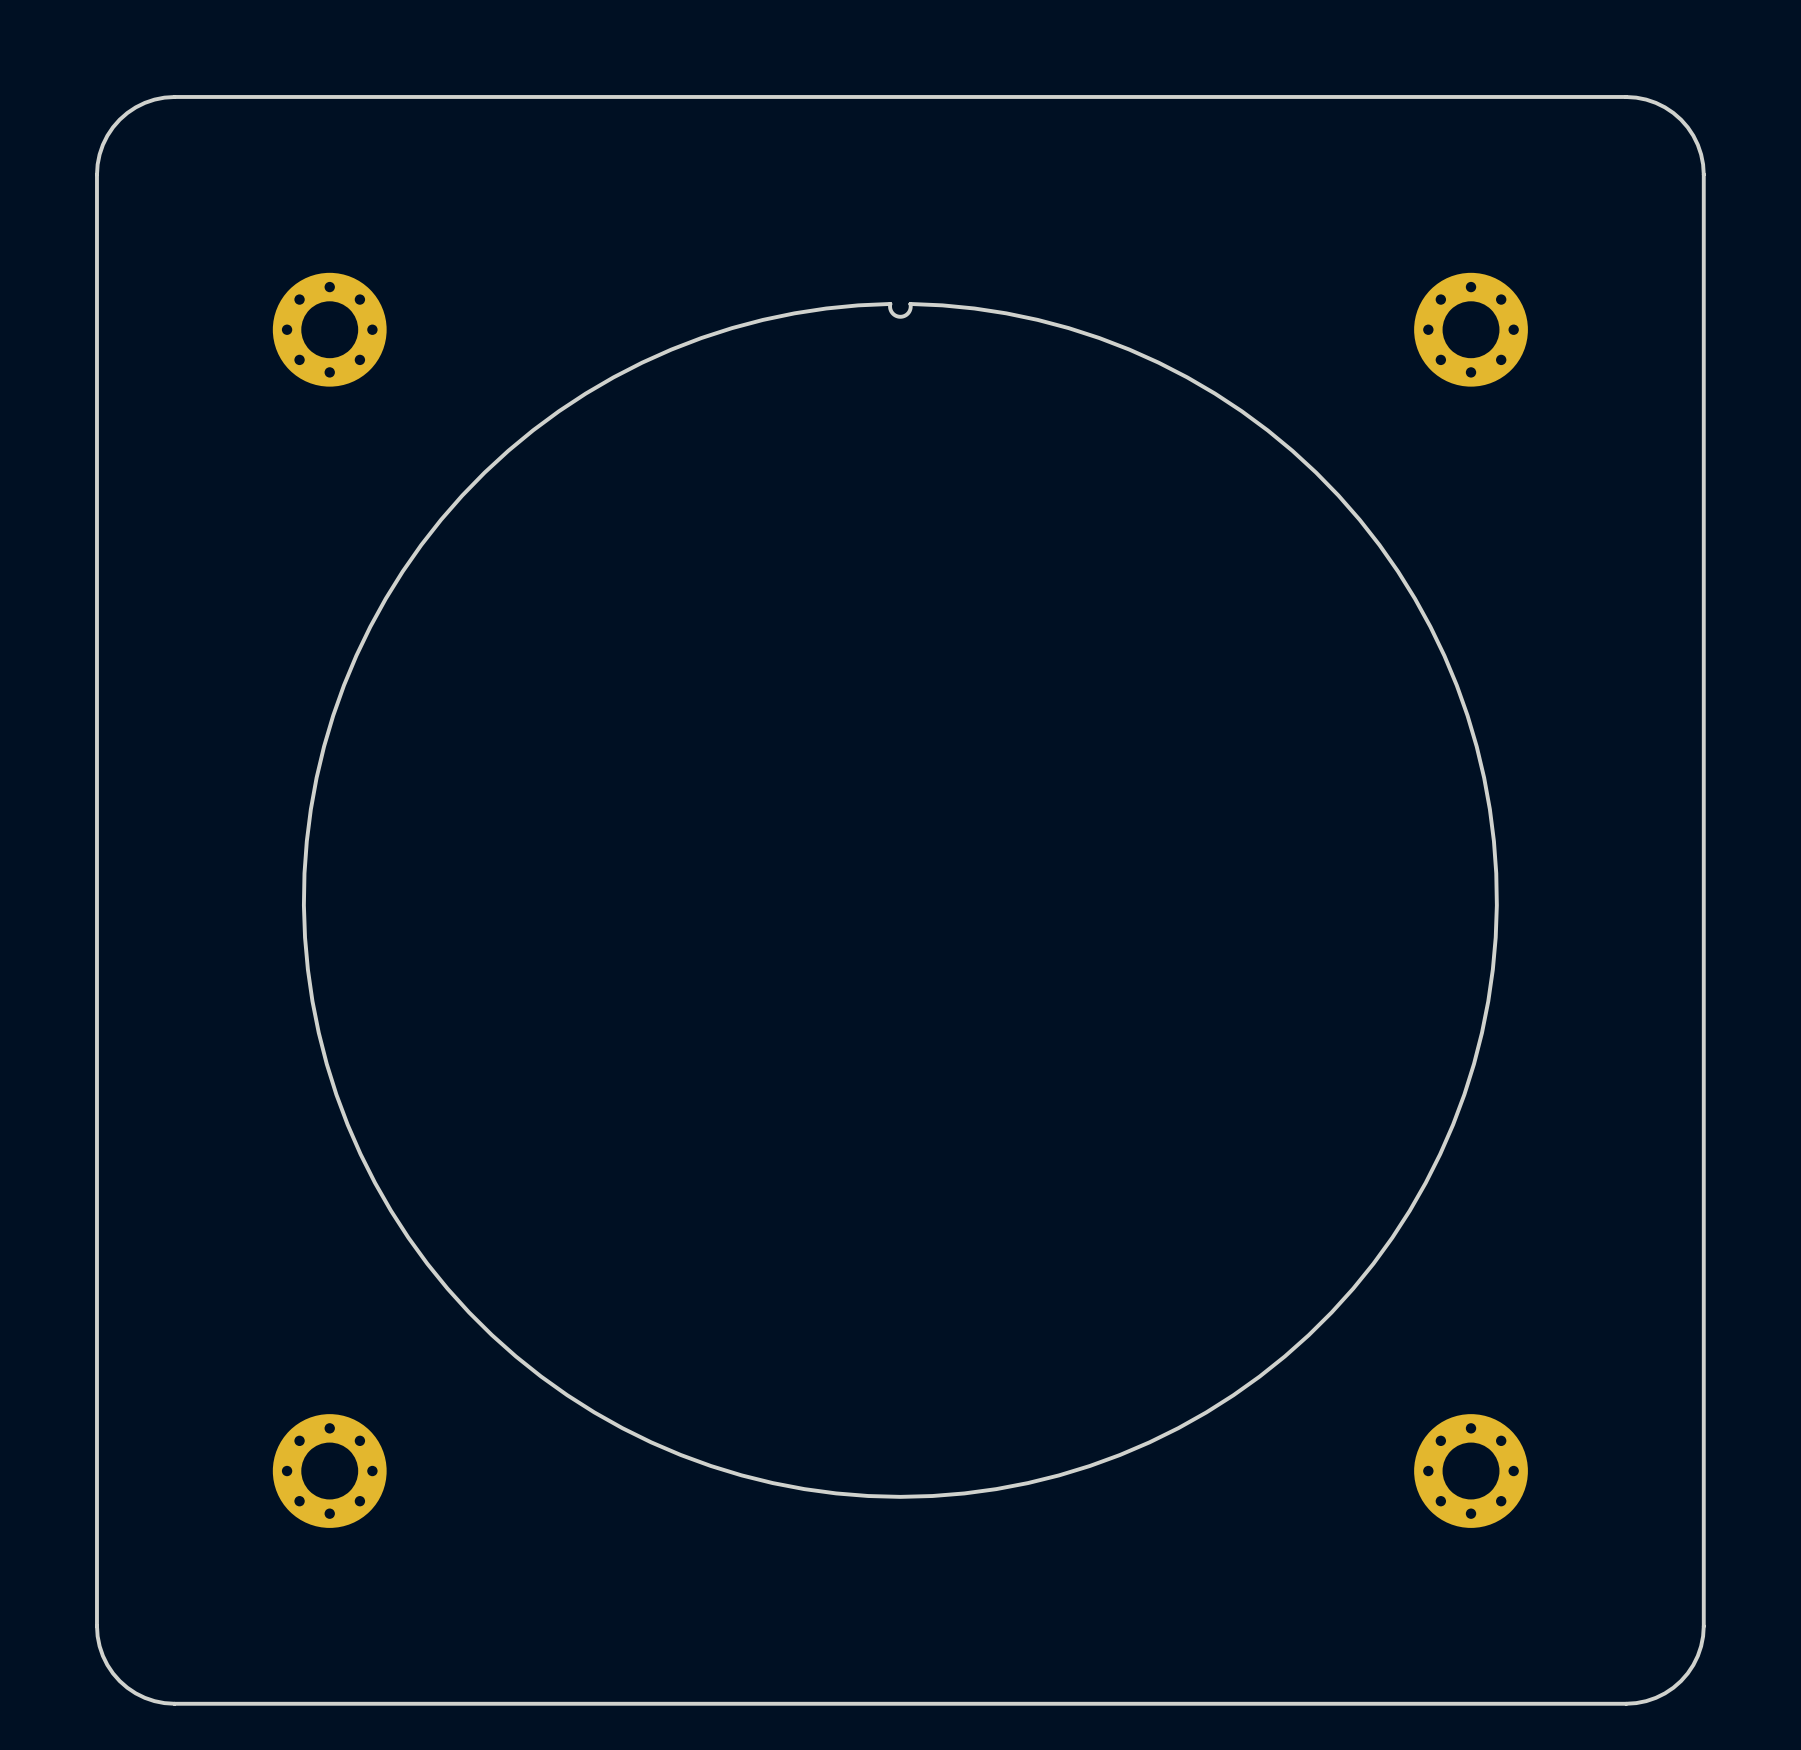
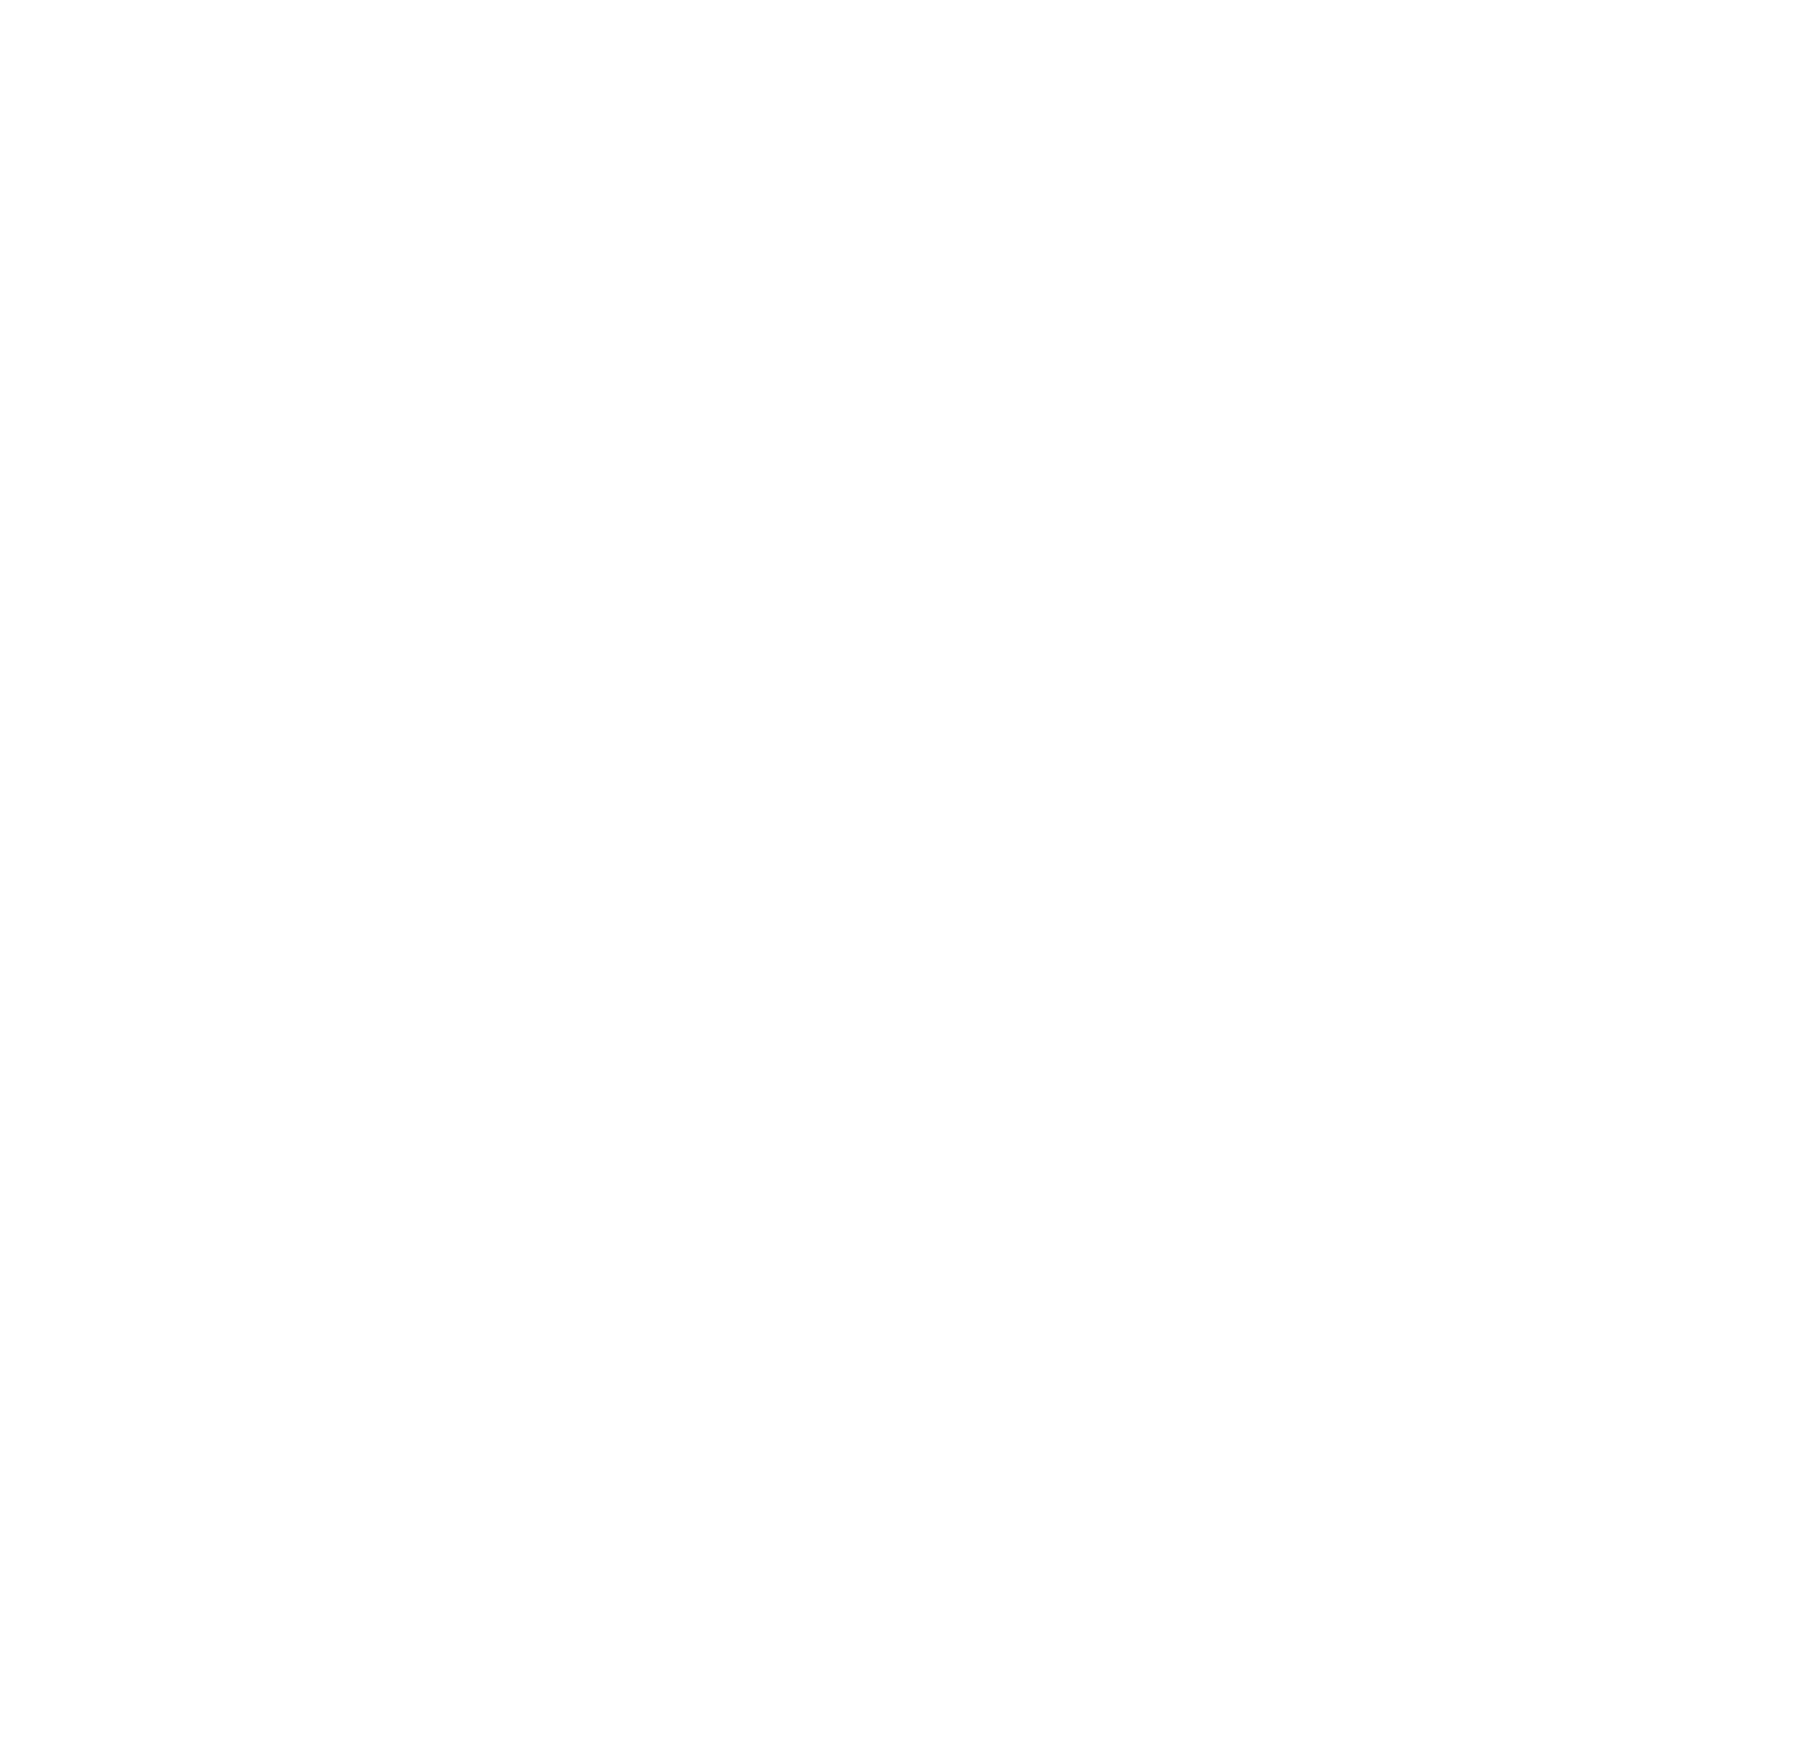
board edge: (174, 96) (1626, 96) (1655, 102) (1681, 119) (1697, 144) (1703, 174) (1703, 1626) (1697, 1655) (1681, 1681) (1655, 1697) (1626, 1703) (174, 1703) (144, 1697) (119, 1681) (102, 1655) (96, 1626) (96, 174) (102, 144) (119, 119) (144, 102) (174, 96) -> none
board edge: (890, 303) (826, 308) (794, 313) (731, 328) (671, 349) (613, 377) (558, 411) (508, 450) (484, 472) (441, 519) (402, 571) (385, 598) (356, 655) (333, 715) (316, 777) (306, 841) (303, 905) (307, 969) (318, 1032) (336, 1094) (360, 1154) (390, 1210) (408, 1237) (447, 1288) (491, 1335) (541, 1376) (594, 1412) (651, 1442) (680, 1454) (710, 1465) (772, 1483) (836, 1493) (900, 1496) (964, 1493) (1027, 1483) (1059, 1475) (1120, 1454) (1149, 1442) (1206, 1412) (1259, 1376) (1308, 1335) (1353, 1288) (1392, 1237) (1425, 1182) (1453, 1124) (1474, 1063) (1488, 1001) (1495, 937) (1496, 905) (1493, 841) (1484, 777) (1467, 715) (1444, 655) (1414, 598) (1379, 545) (1359, 519) (1316, 472) (1267, 430) (1214, 393) (1187, 377) (1129, 349) (1068, 328) (1006, 313) (974, 308) (910, 303) (908, 312) (899, 316) (892, 312) (890, 303) -> none
part: (329, 329) -> none
part: (1471, 329) -> none
part: (329, 1471) -> none
part: (1471, 1471) -> none

